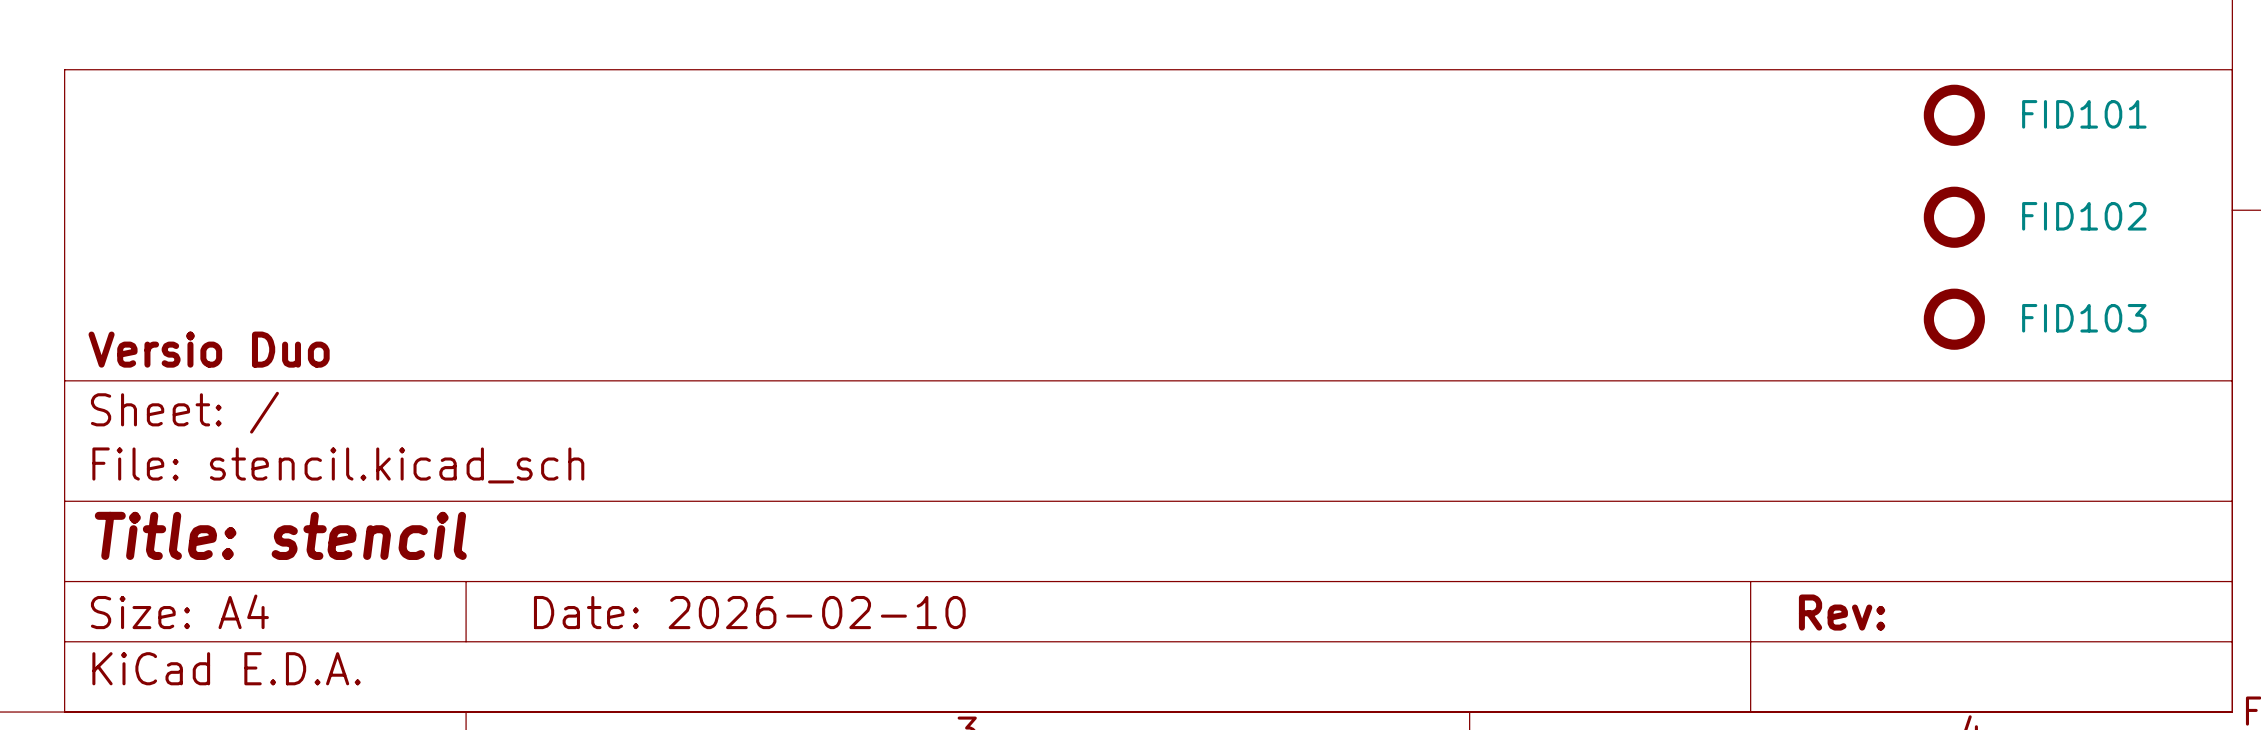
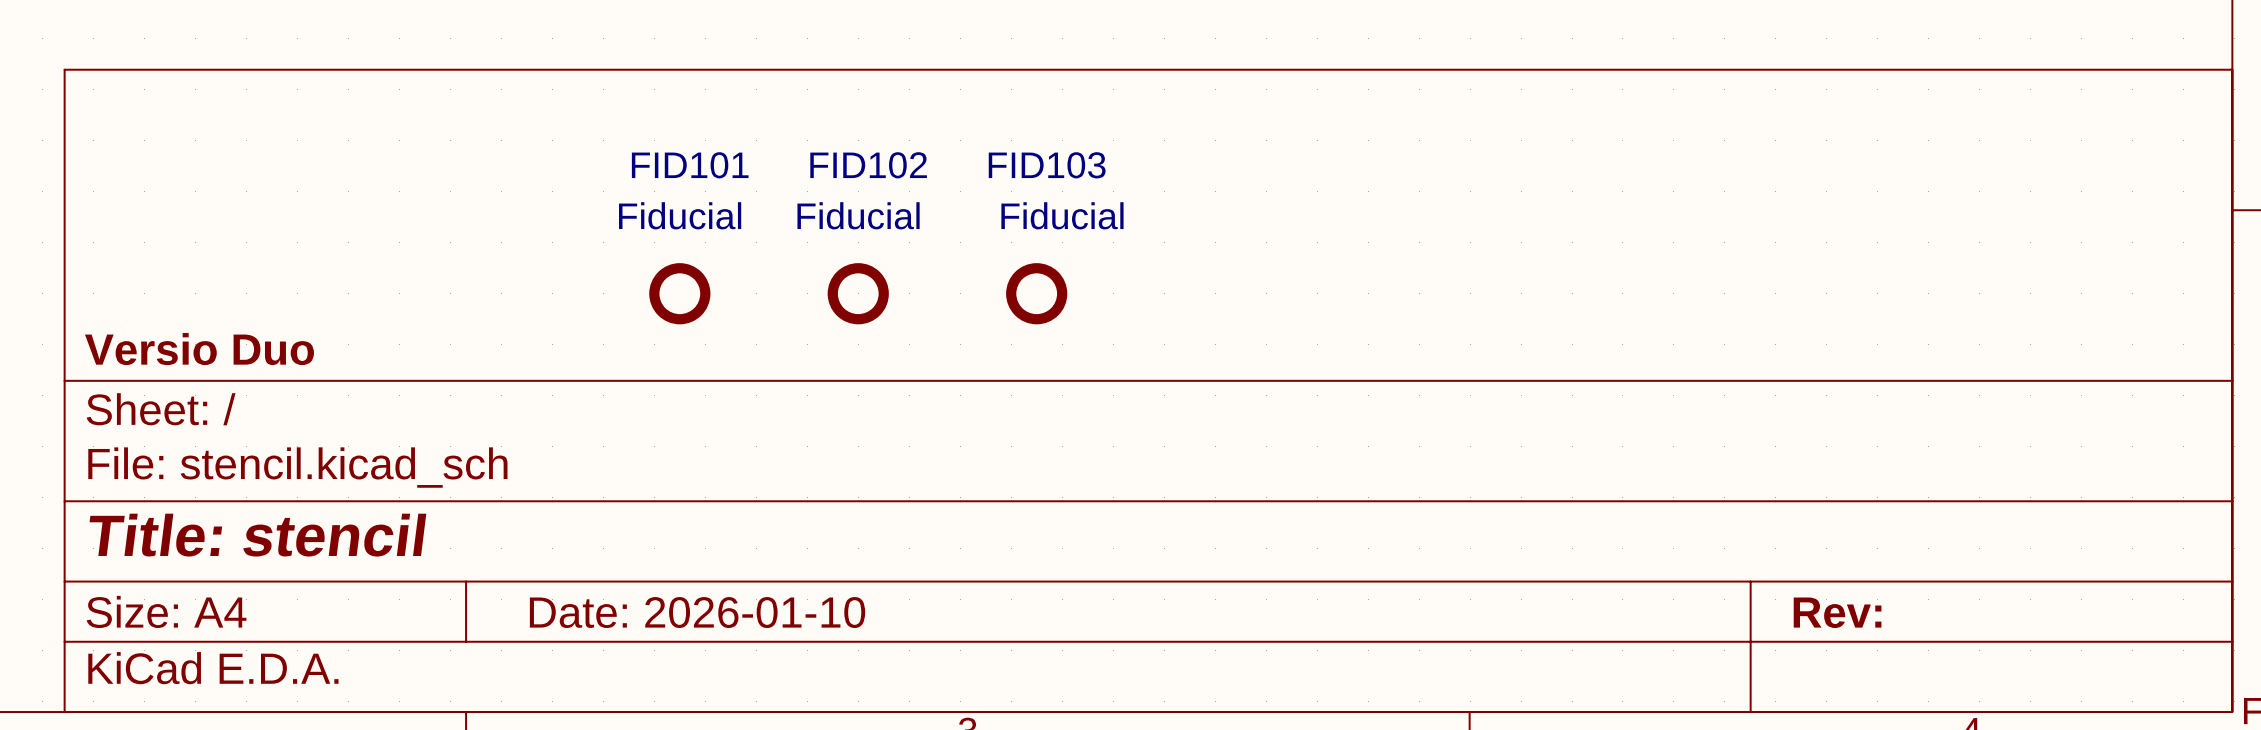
FID101 name position: FID101 (2084, 114) -> FID101 (690, 165)
FID101 position: (1954, 115) -> (679, 293)
FID101 value: none -> Fiducial (680, 215)
FID102 value: none -> Fiducial (858, 215)
FID103 value: none -> Fiducial (1062, 215)
FID102 name position: FID102 (2084, 216) -> FID102 (868, 165)
FID102 position: (1954, 217) -> (858, 293)
FID103 name position: FID103 (2084, 318) -> FID103 (1047, 165)
FID103 position: (1954, 319) -> (1036, 293)
title block: Date: 2026-02-10 (749, 612) -> Date: 2026-01-10 (697, 612)

